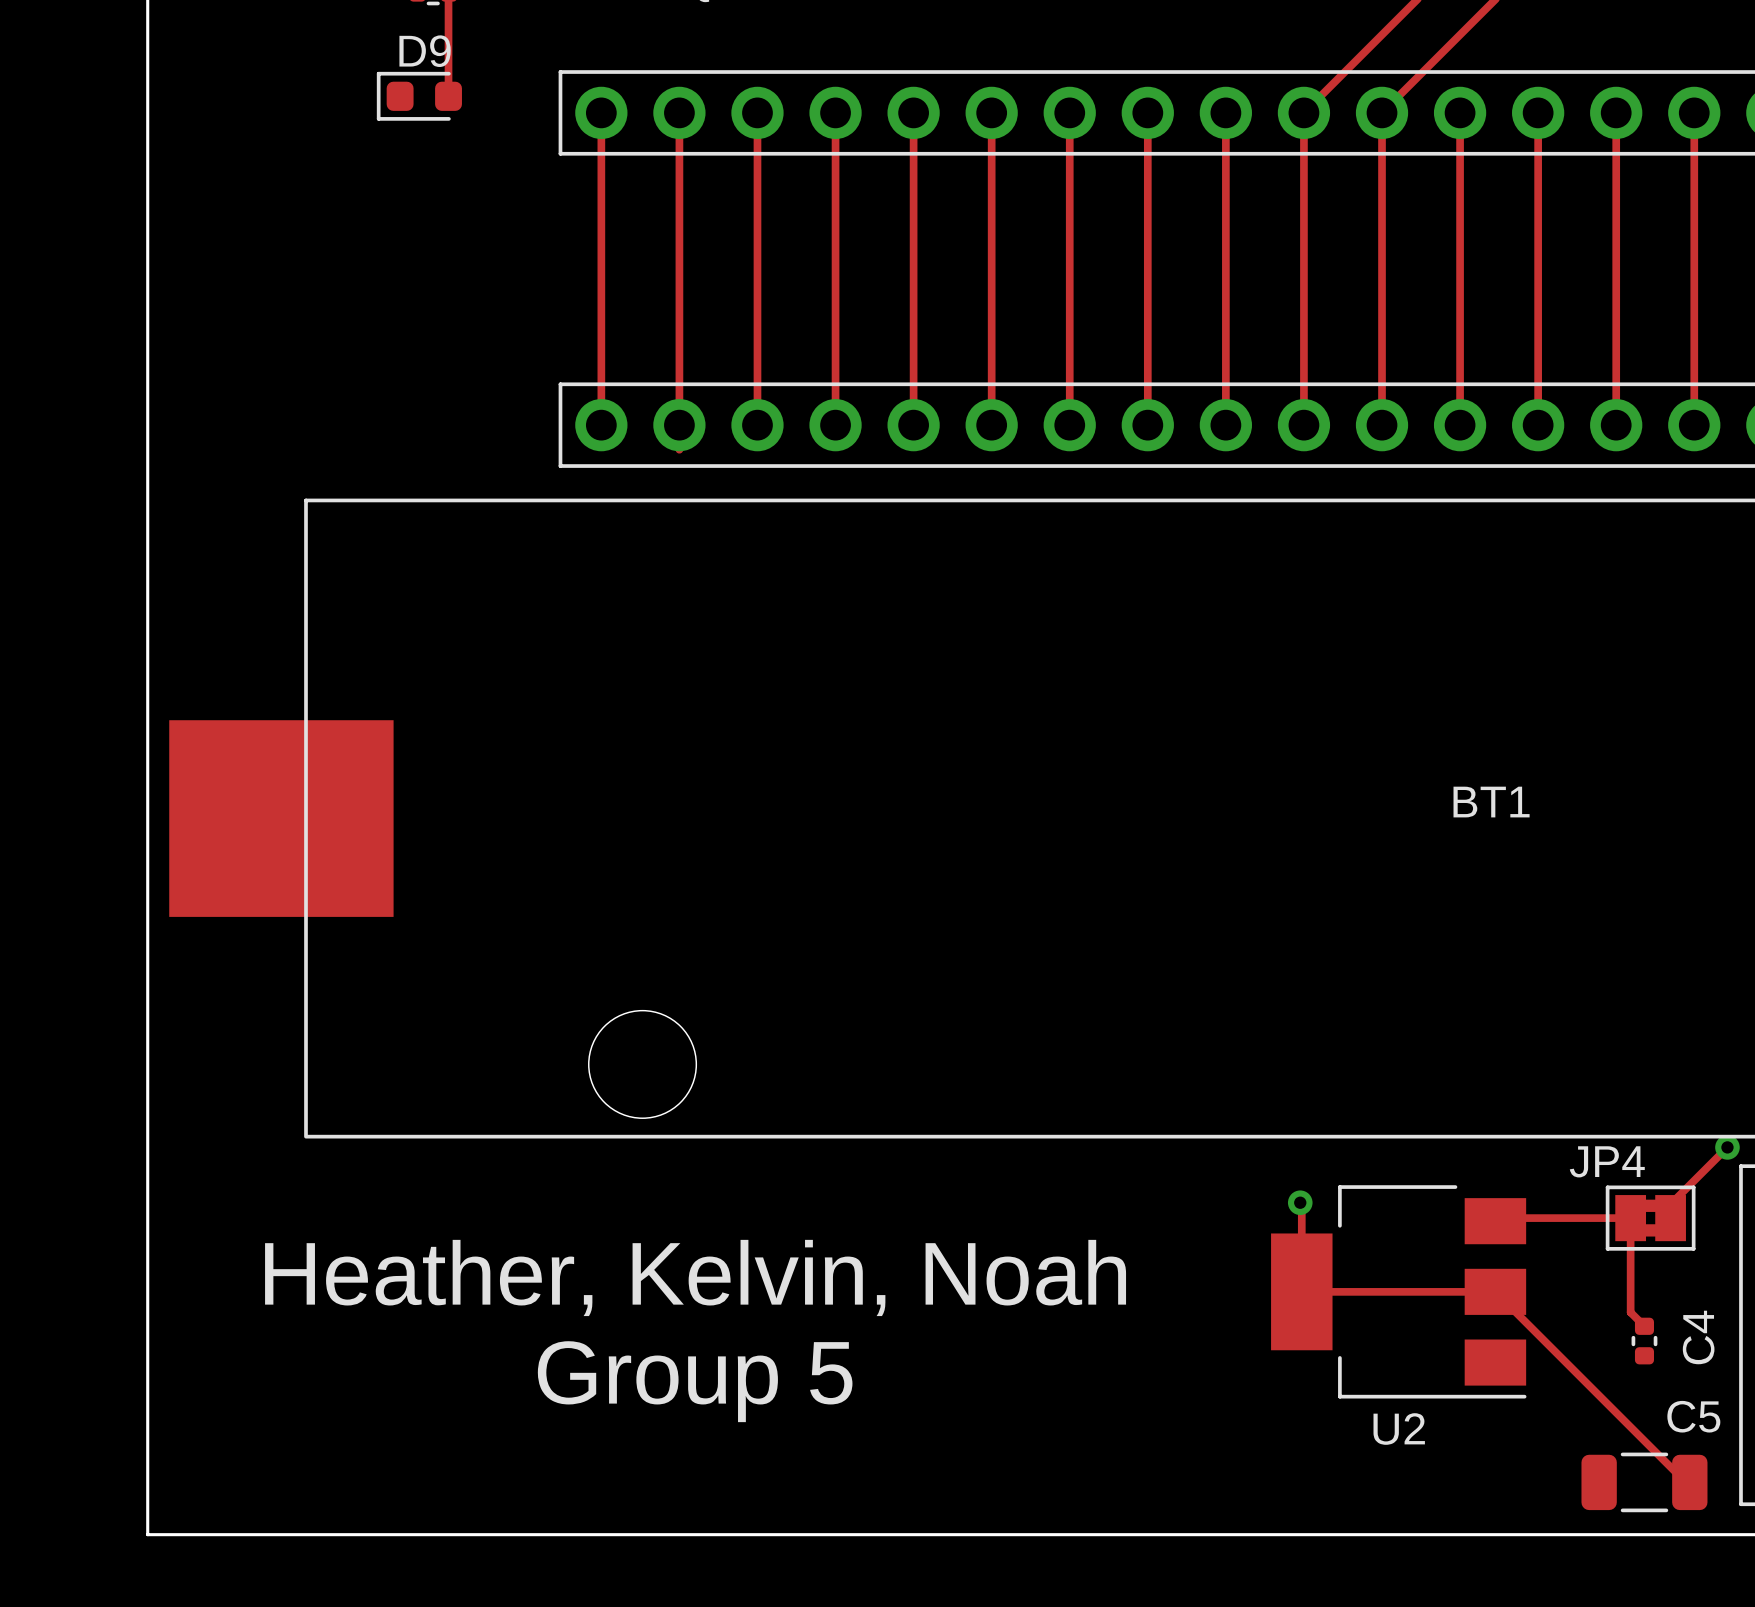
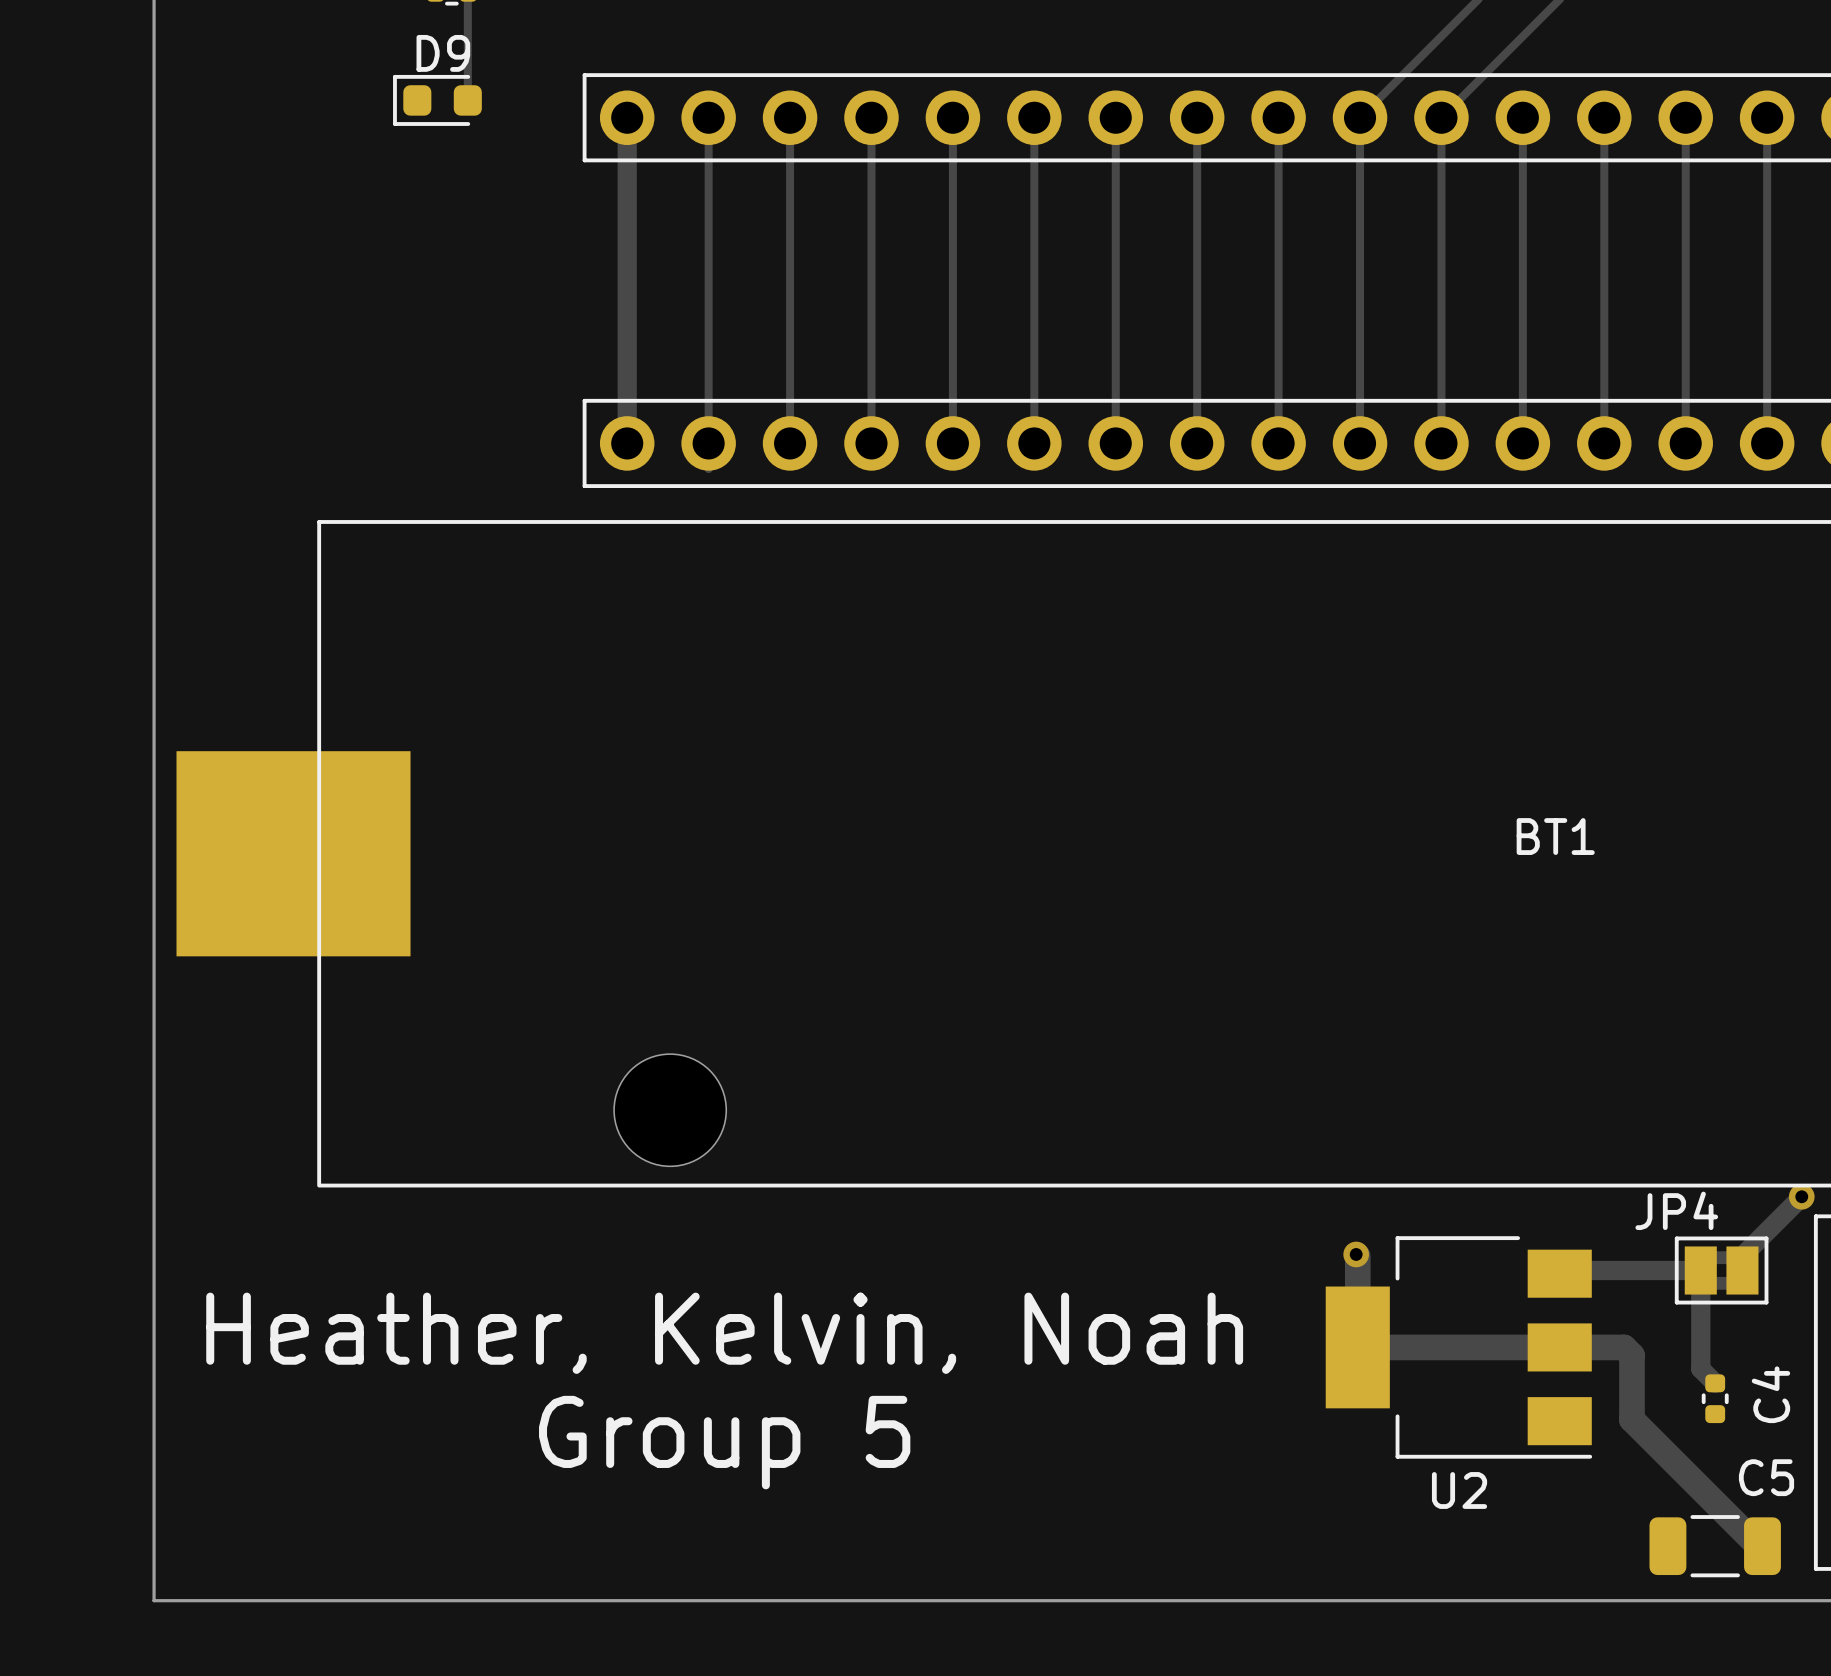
track width: thin (601, 112) (601, 425) -> thick (627, 117) (627, 443)
track width: thin (1727, 1147) (1670, 1204) (1670, 1218) -> thick (1801, 1196) (1742, 1256) (1742, 1270)
track width: thin (1301, 1204) (1301, 1291) (1495, 1291) -> thick (1357, 1256) (1357, 1347) (1559, 1347)
track width: thin (1498, 1218) (1630, 1218) (1630, 1312) (1644, 1326) -> thick (1562, 1270) (1700, 1270) (1700, 1368) (1715, 1383)
track: (1495, 1291) (1564, 1361) -> (1559, 1347) (1624, 1347) (1631, 1355) (1631, 1419)
track width: thin (1564, 1361) (1685, 1482) -> thick (1631, 1419) (1758, 1546)

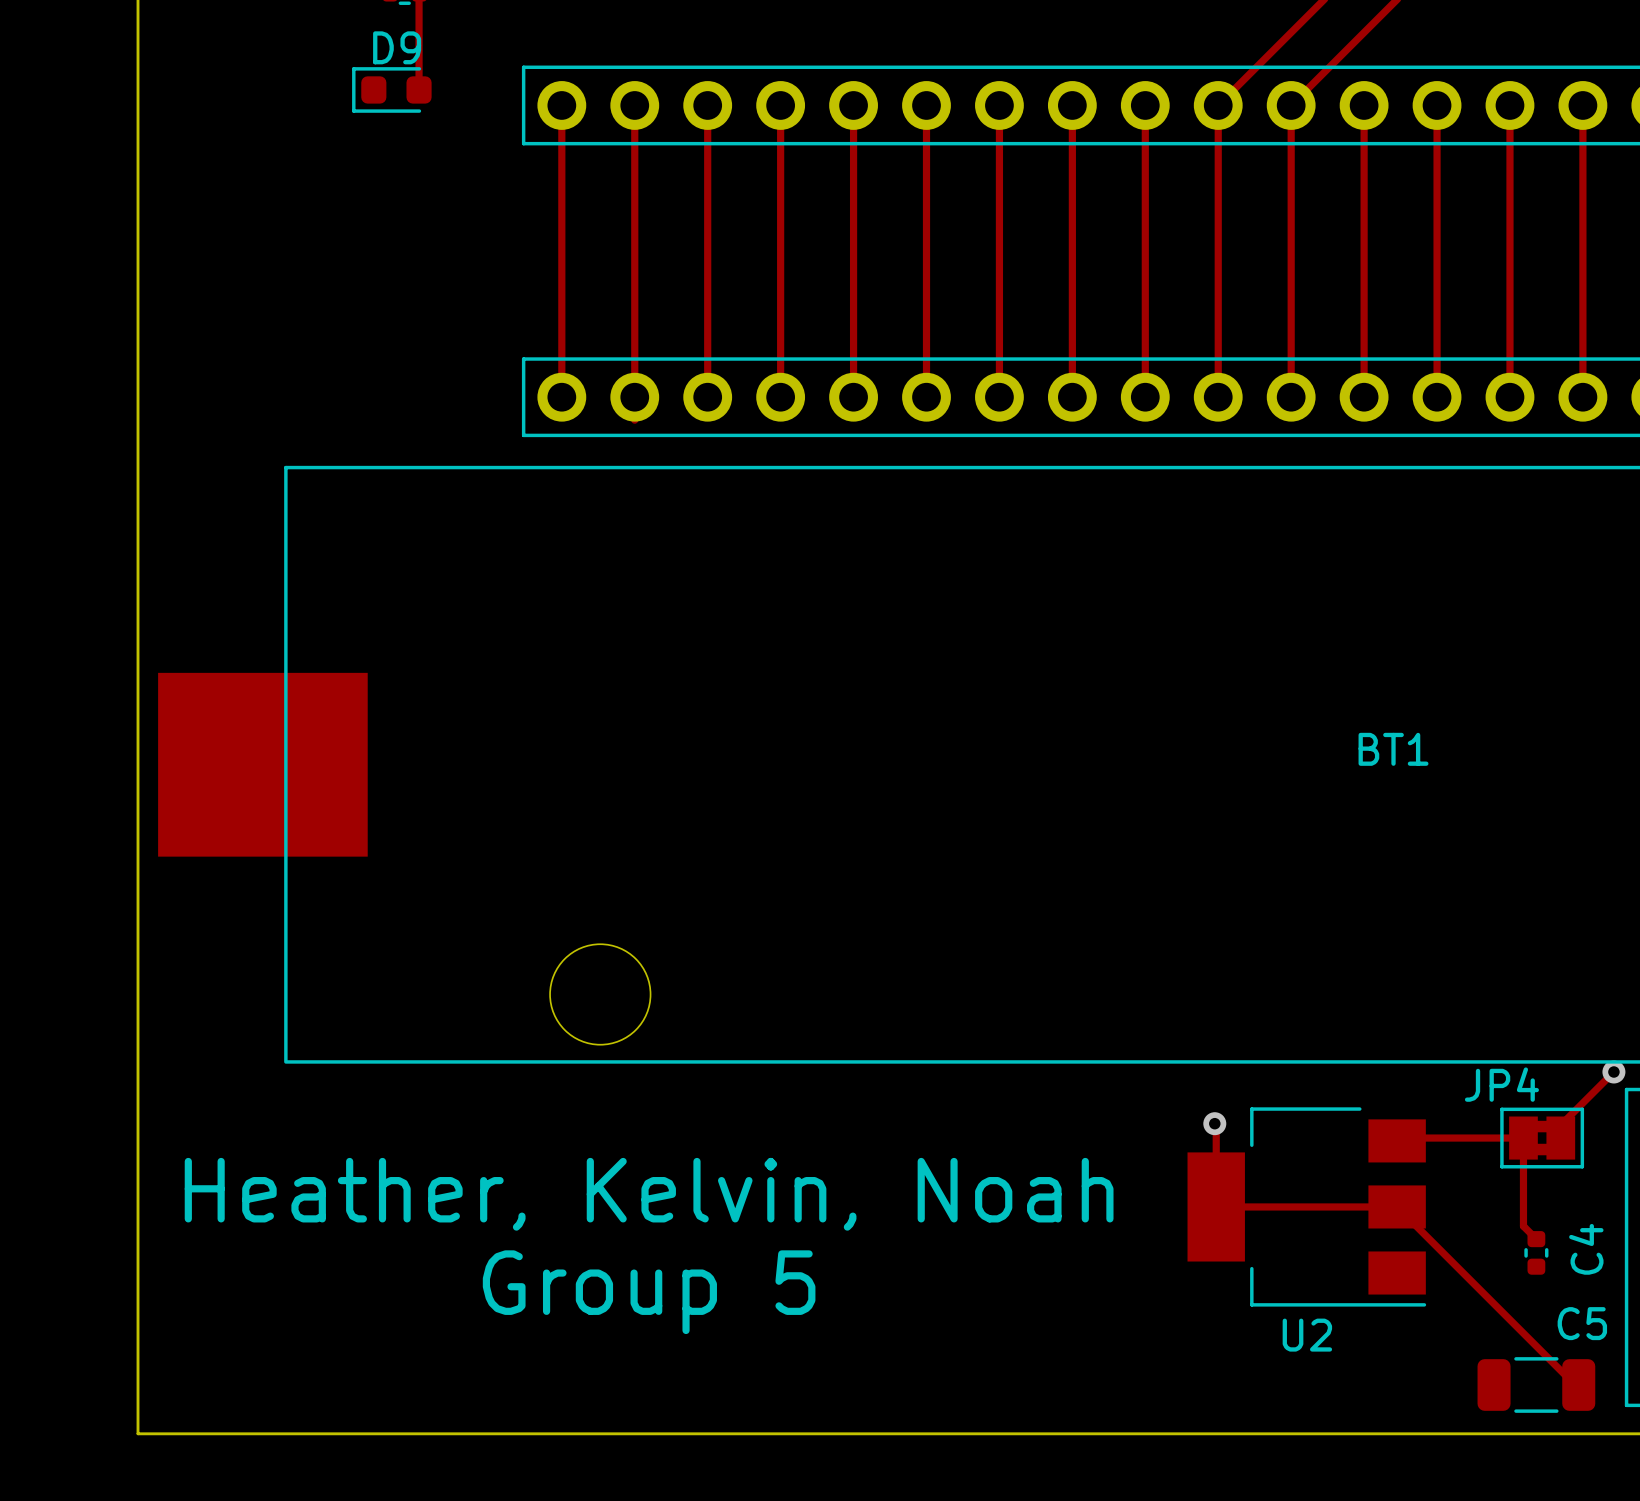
track width: thick (627, 117) (627, 443) -> thin (561, 105) (561, 397)
track width: thick (1801, 1196) (1742, 1256) (1742, 1270) -> thin (1613, 1072) (1560, 1125) (1560, 1138)
track width: thick (1357, 1256) (1357, 1347) (1559, 1347) -> thin (1216, 1125) (1216, 1206) (1397, 1206)
track width: thick (1562, 1270) (1700, 1270) (1700, 1368) (1715, 1383) -> thin (1400, 1138) (1523, 1138) (1523, 1226) (1536, 1239)
track: (1559, 1347) (1624, 1347) (1631, 1355) (1631, 1419) -> (1397, 1206) (1461, 1271)
track width: thick (1631, 1419) (1758, 1546) -> thin (1461, 1271) (1575, 1384)

